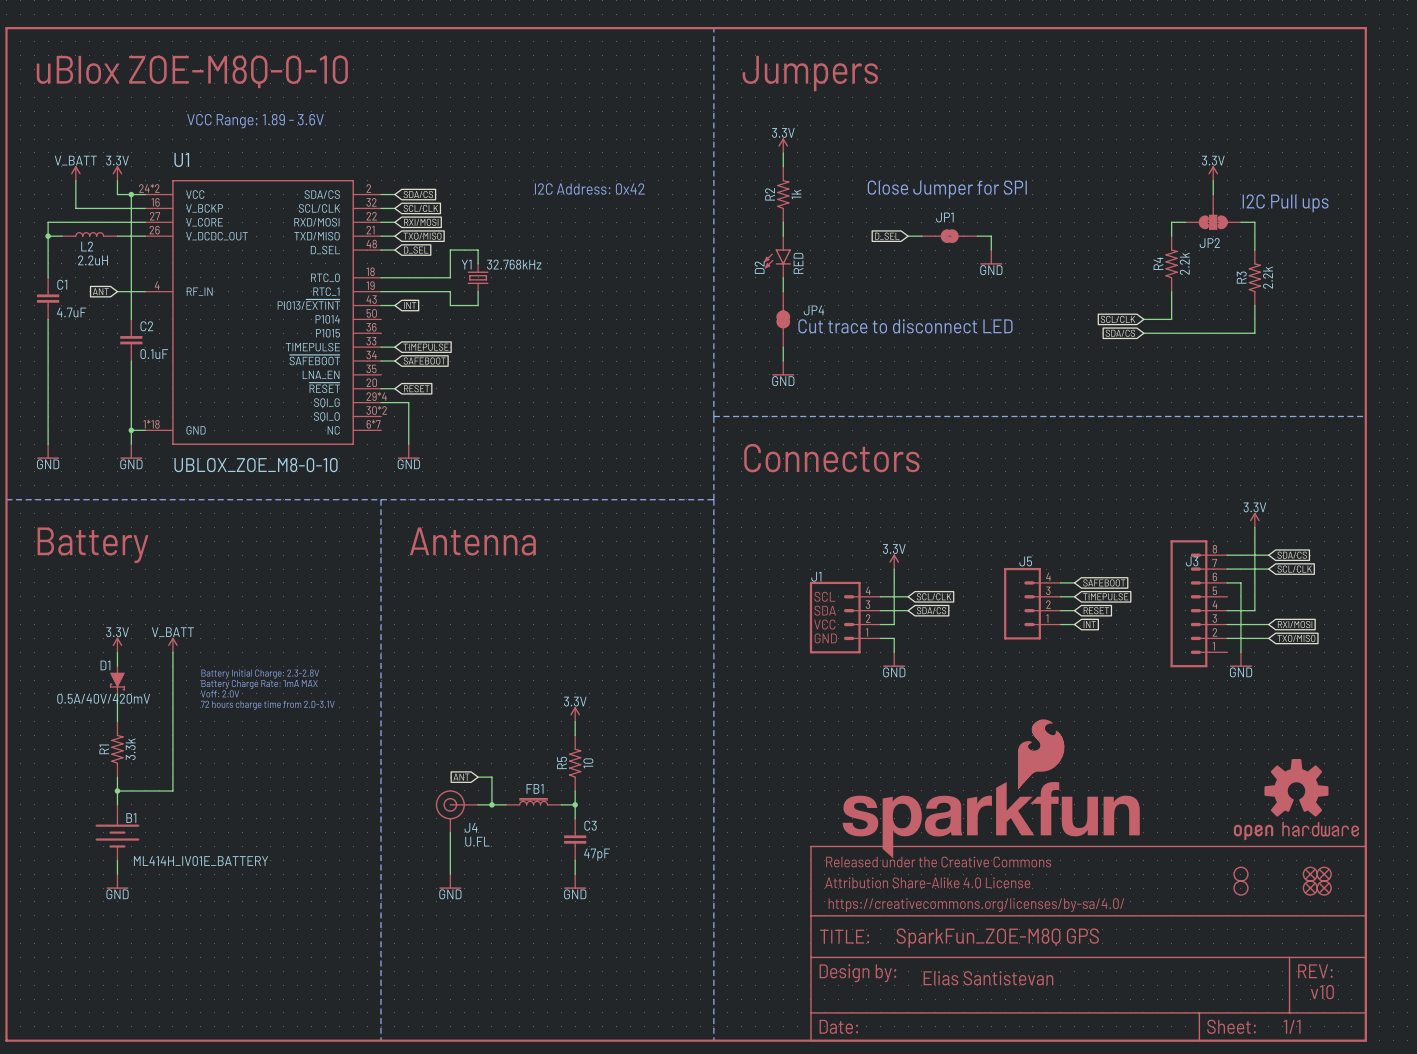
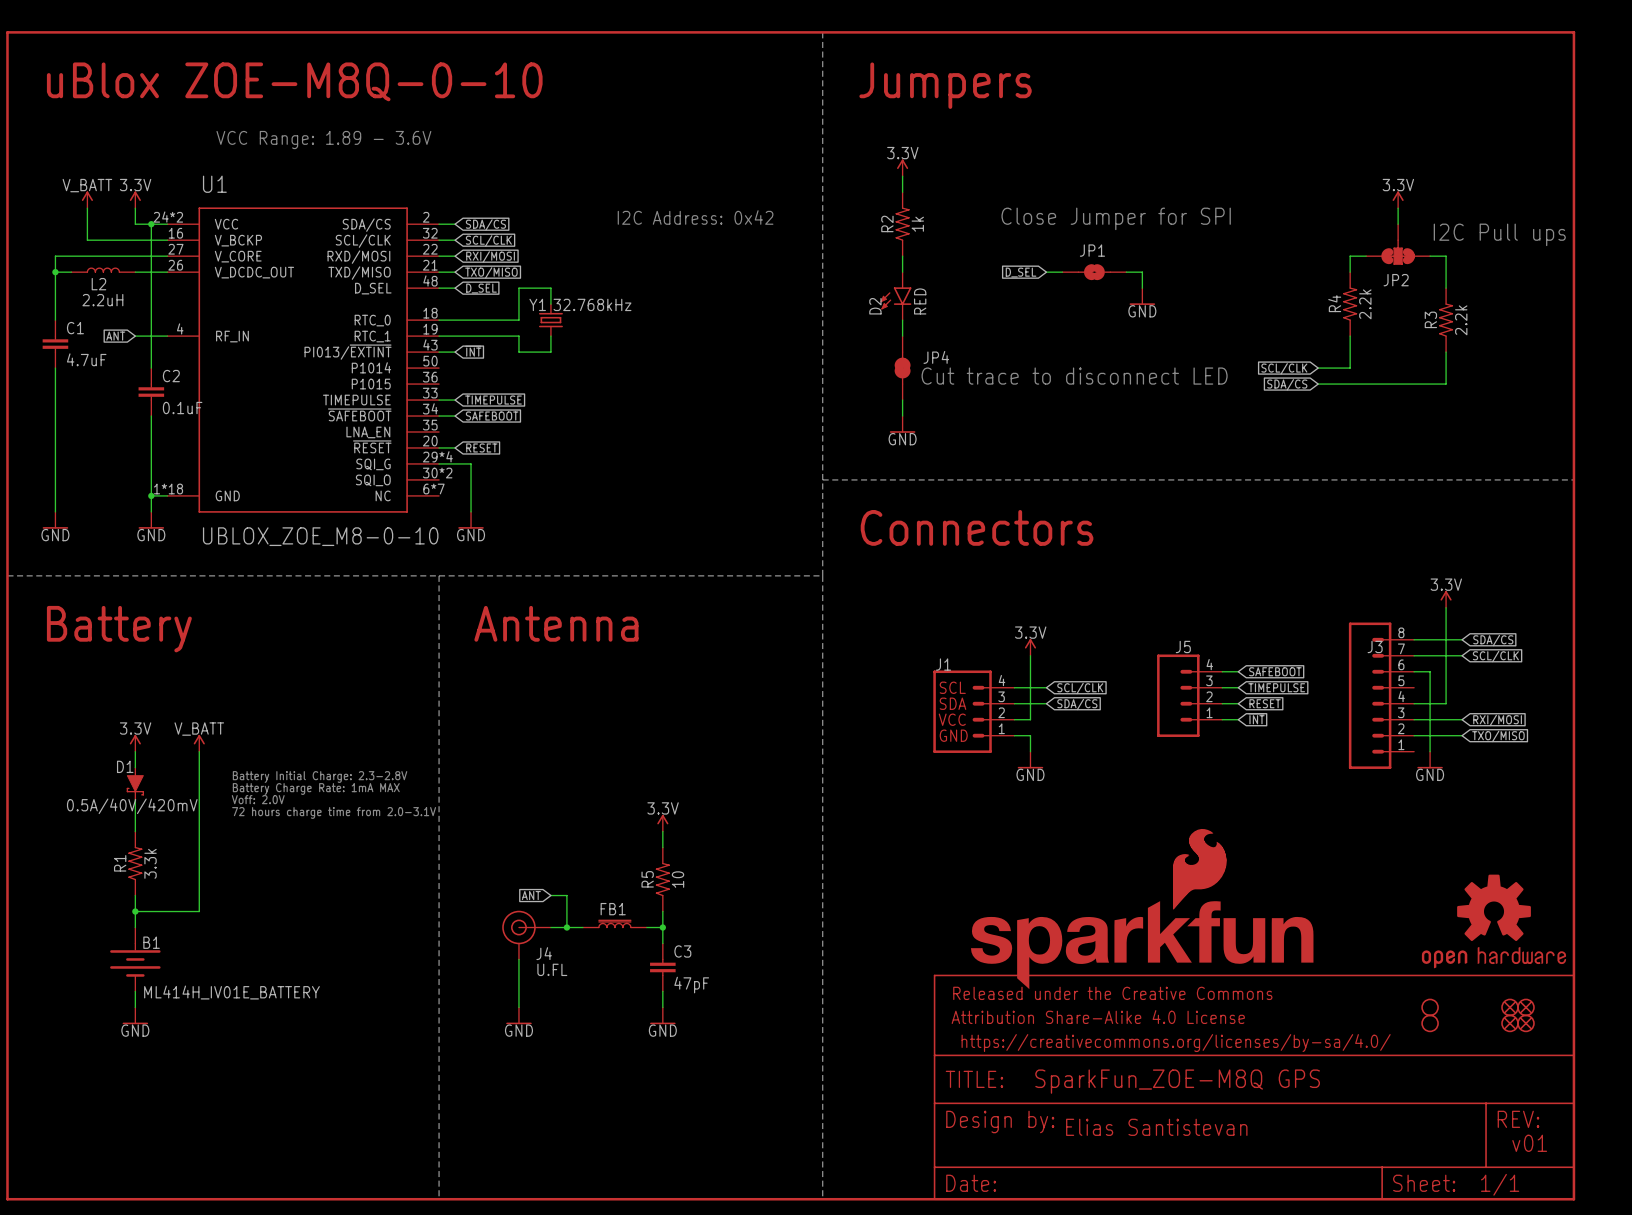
text: v10 (1322, 992) -> v01 (1529, 1143)

